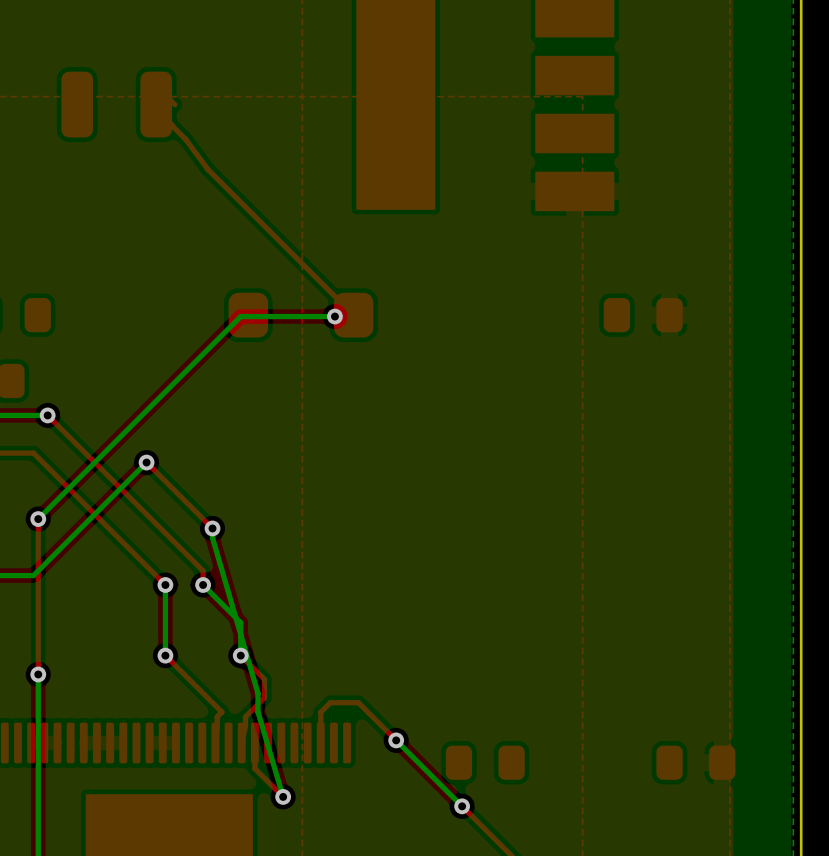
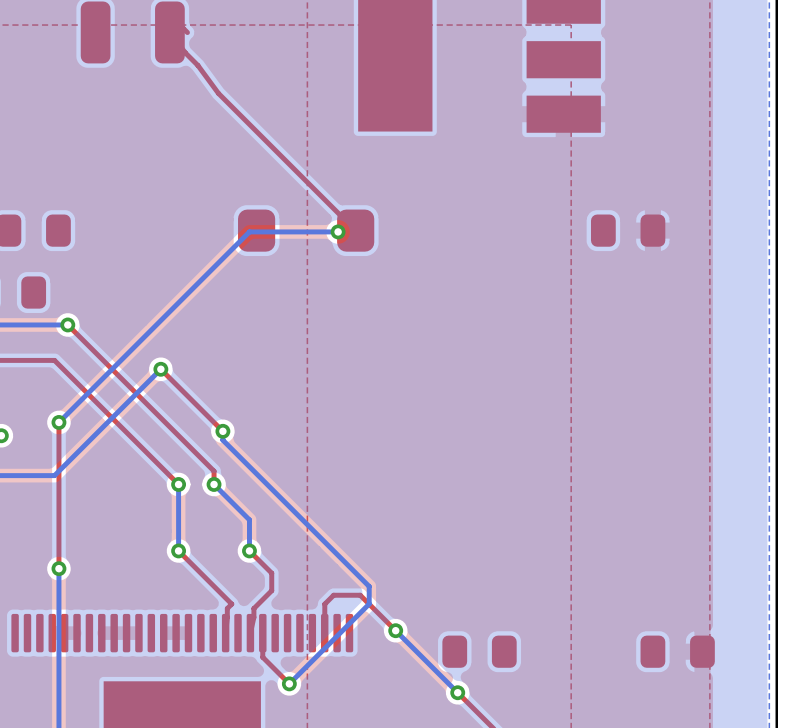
bottom track: (212, 537) (258, 693) (258, 712) (283, 796) -> (222, 440) (369, 586) (369, 604) (289, 683)

